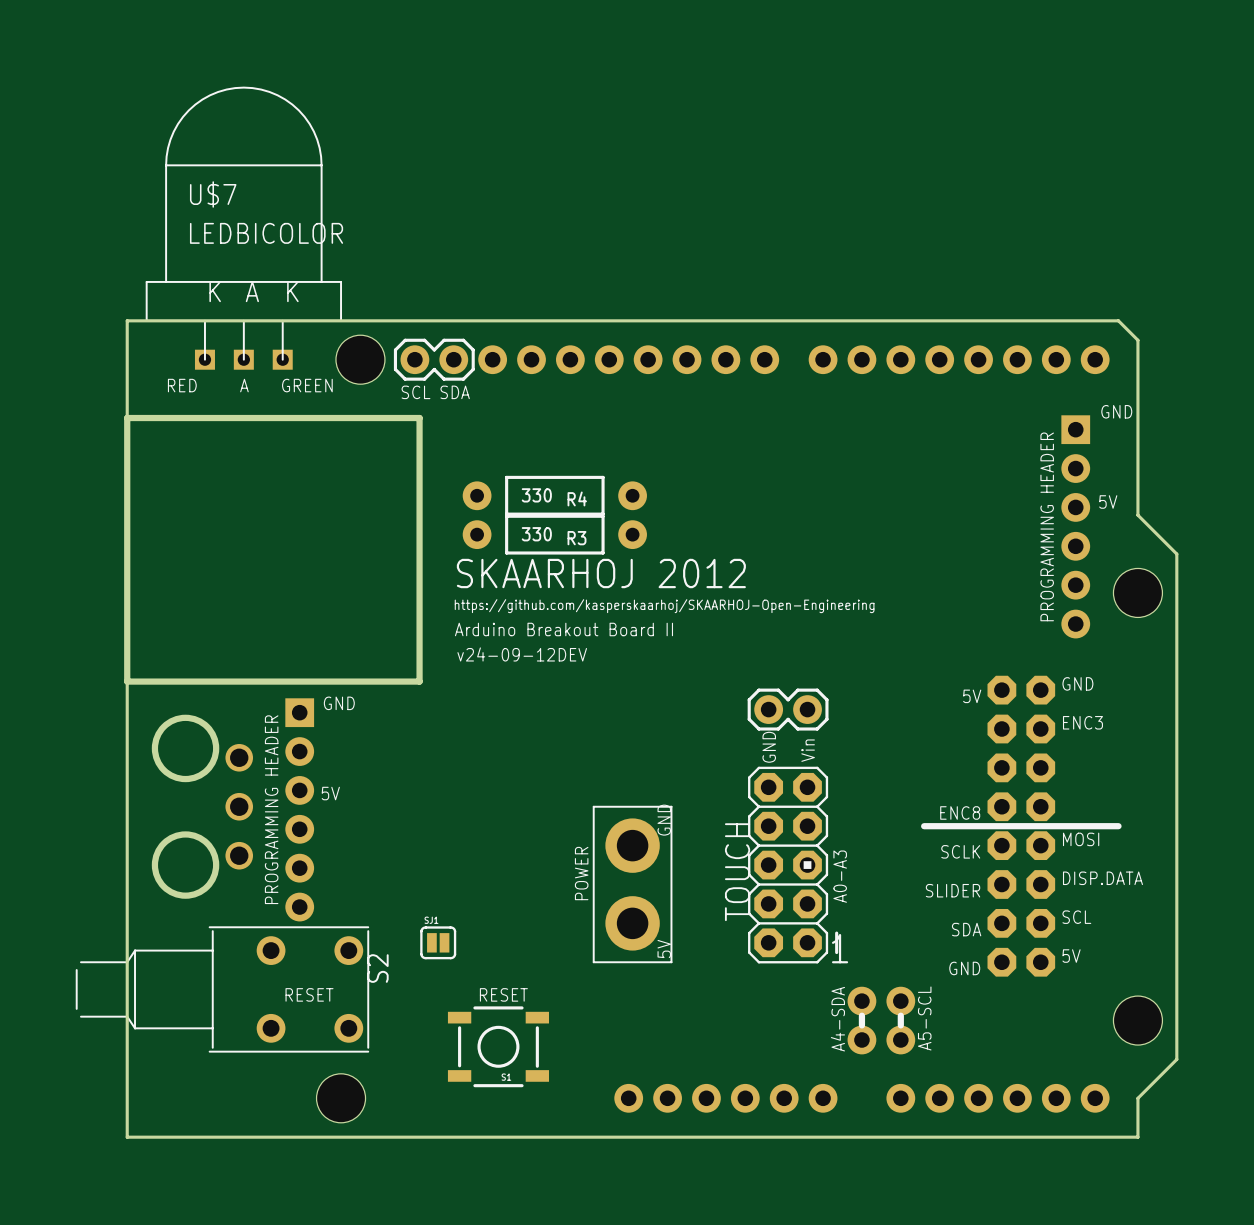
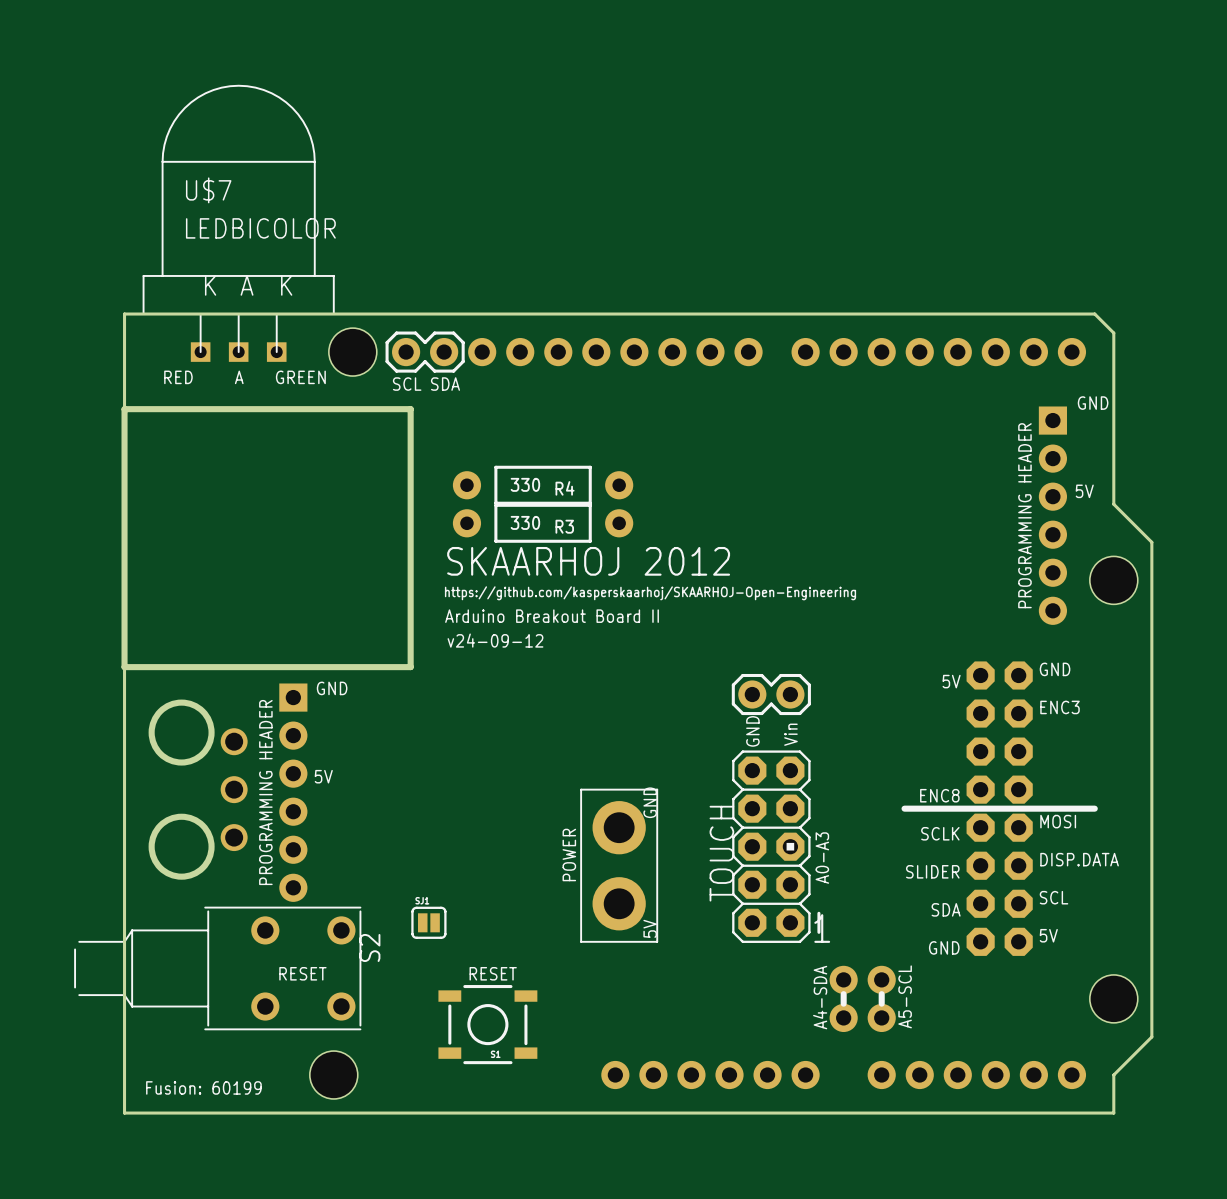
text: v24-09-12DEV (522, 654) -> v24-09-12 (495, 640)
text: none -> Fusion: 60199 (203, 1087)

